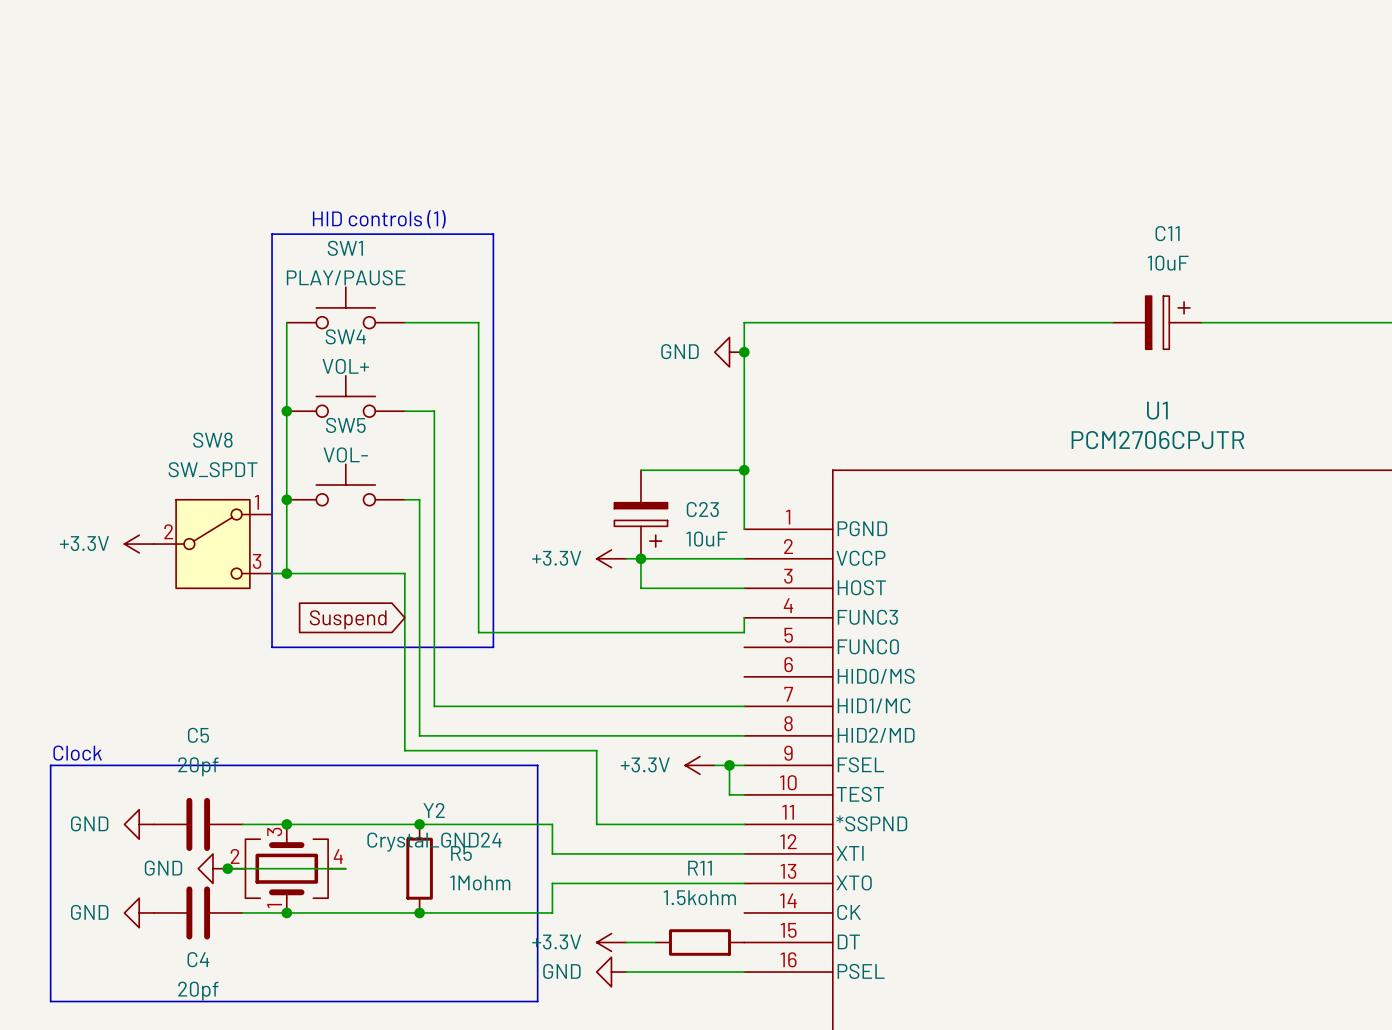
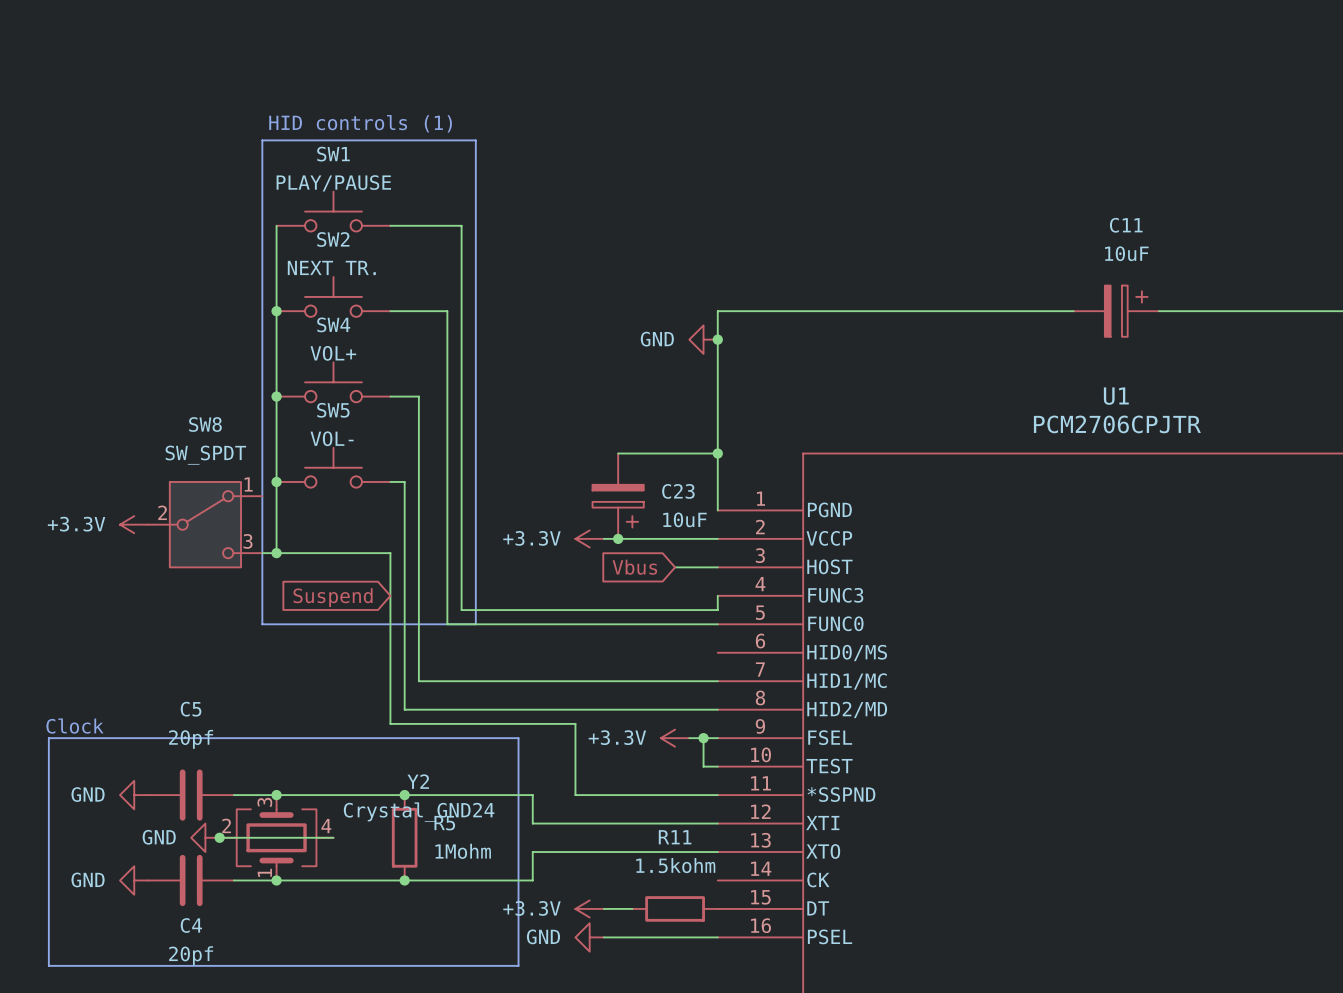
SW1: none -> PLAY/PAUSE (333, 211)
text position: HID controls (1) (379, 219) -> HID controls (1) (360, 123)
line: (272, 234) (493, 234) -> (262, 225) (262, 140) (475, 140) (475, 225)
wire: none -> (276, 225) (276, 311)
SW1 name: SW1 (345, 248) -> SW2 (333, 239)
SW1 value: PLAY/PAUSE (346, 277) -> NEXT TR. (331, 267)
junction: none -> (276, 311)
wire: (463, 322) (478, 322) -> (390, 225) (461, 225) (461, 311)
wire: none -> (447, 311) (447, 624) (717, 624)
wire: (640, 558) (640, 588) (699, 588) -> none
global label: none -> Vbus (634, 567)

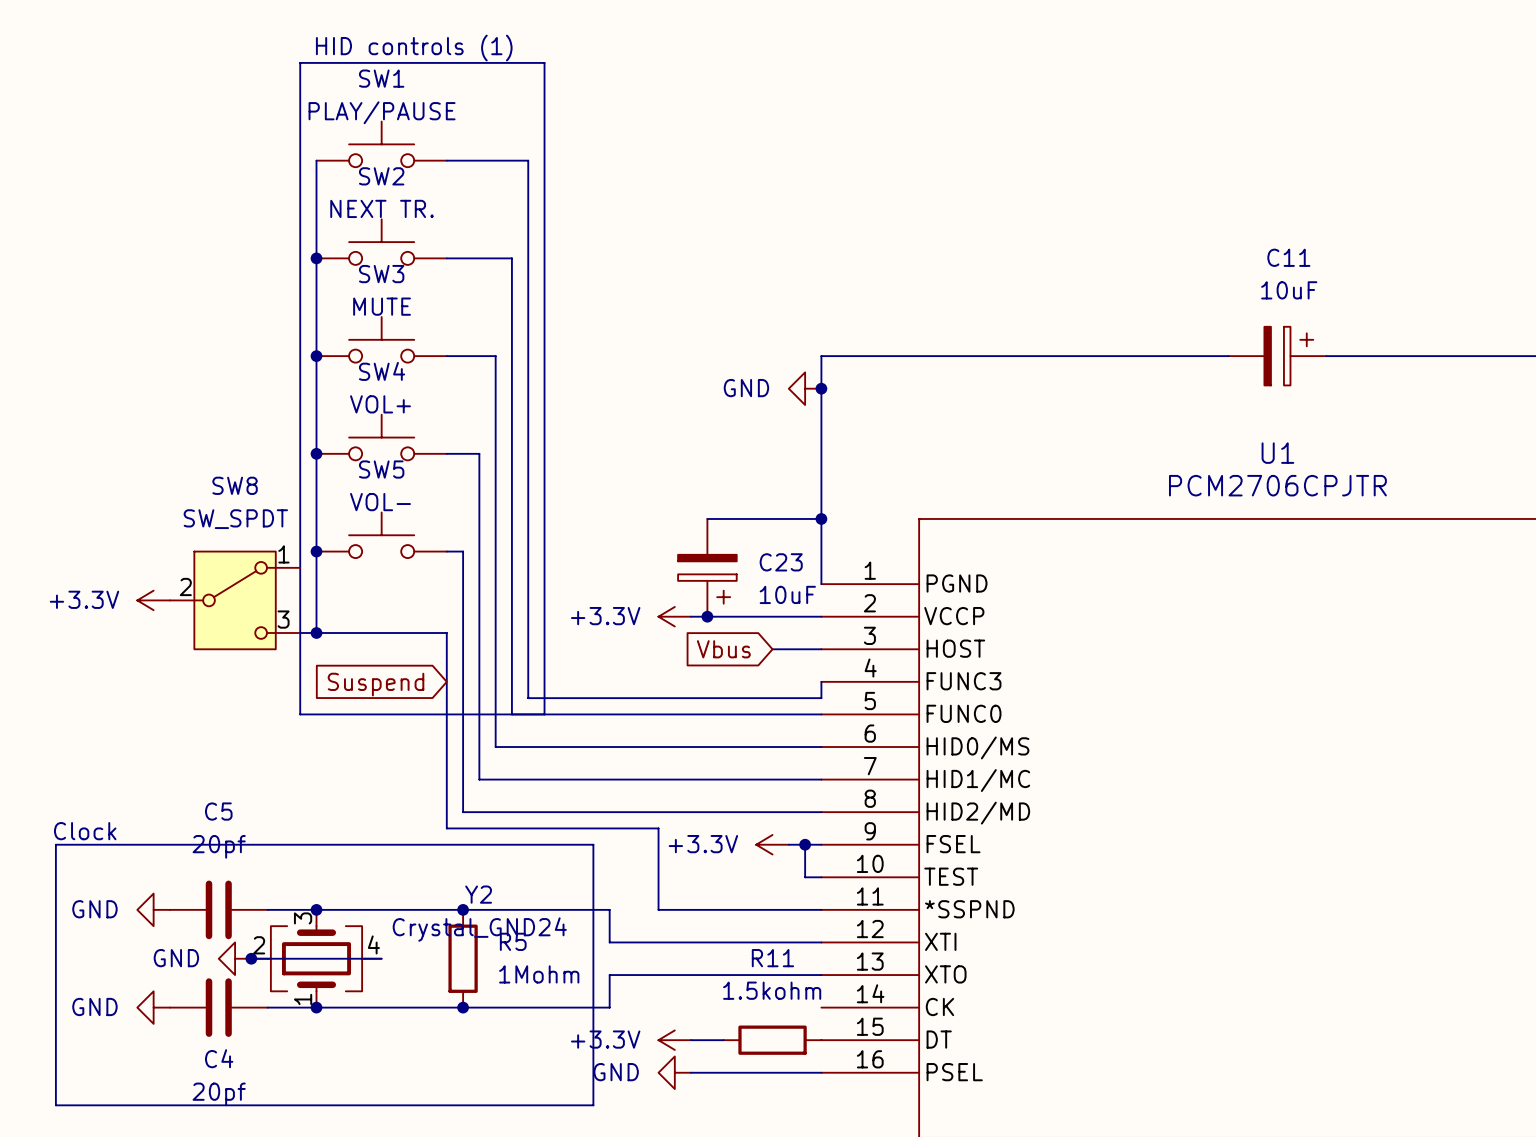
text position: HID controls (1) (360, 123) -> HID controls (1) (414, 48)
SW1: none -> PLAY/PAUSE (381, 144)
line: (262, 140) (475, 140) -> (300, 160) (300, 62) (544, 62) (544, 160)
wire: none -> (316, 160) (316, 258)
SW1 name: SW1 (333, 154) -> SW2 (381, 176)
SW1 value: PLAY/PAUSE (333, 183) -> NEXT TR. (382, 208)
junction: none -> (316, 258)
wire: (447, 225) (461, 225) -> (446, 160) (528, 160) (528, 258)
SW2 name: SW2 (333, 239) -> SW3 (381, 274)
SW2 value: NEXT TR. (331, 267) -> MUTE (382, 306)
wire: (433, 311) (447, 311) -> (511, 258) (511, 356)
wire: none -> (495, 356) (495, 747) (821, 747)

